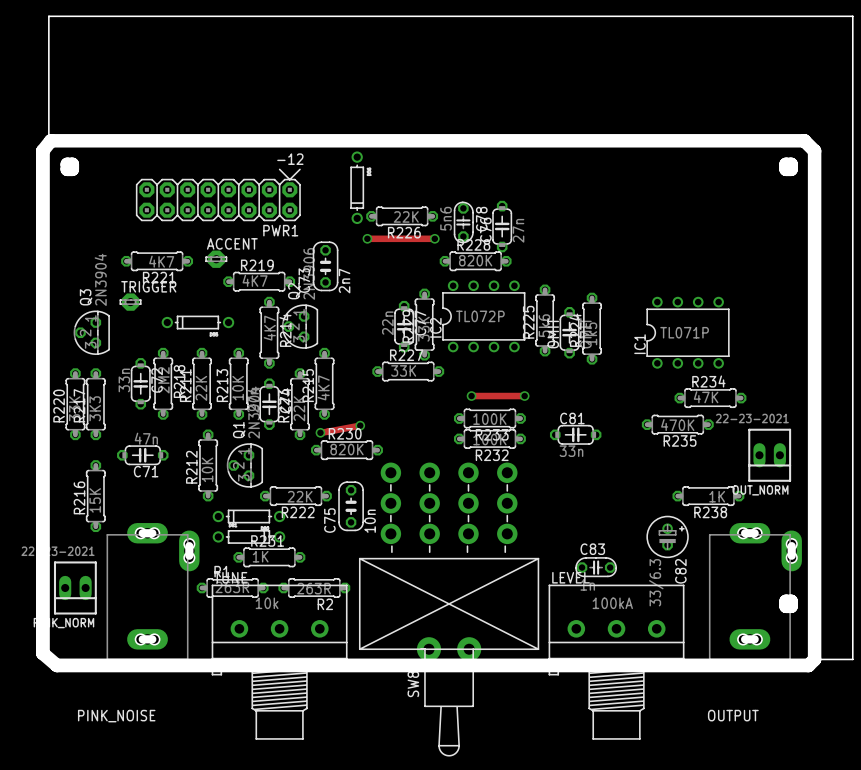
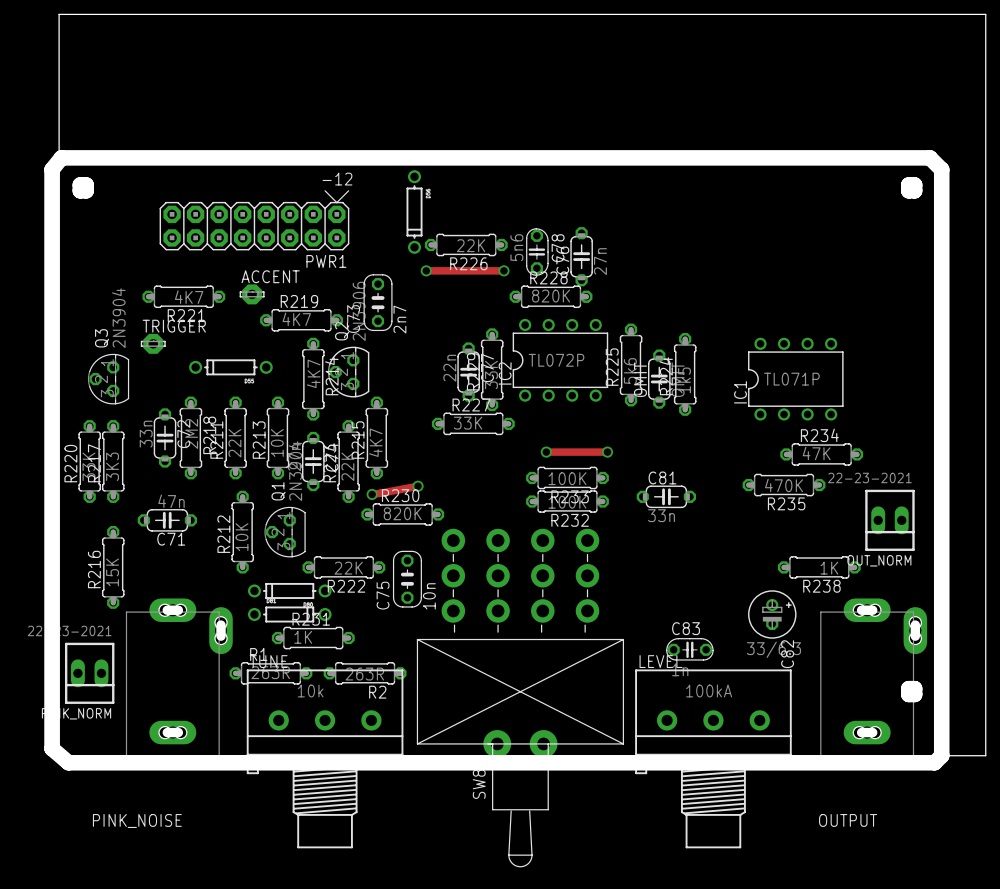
C82 value rotation: 0° (656, 582) -> 90° clockwise (773, 649)

